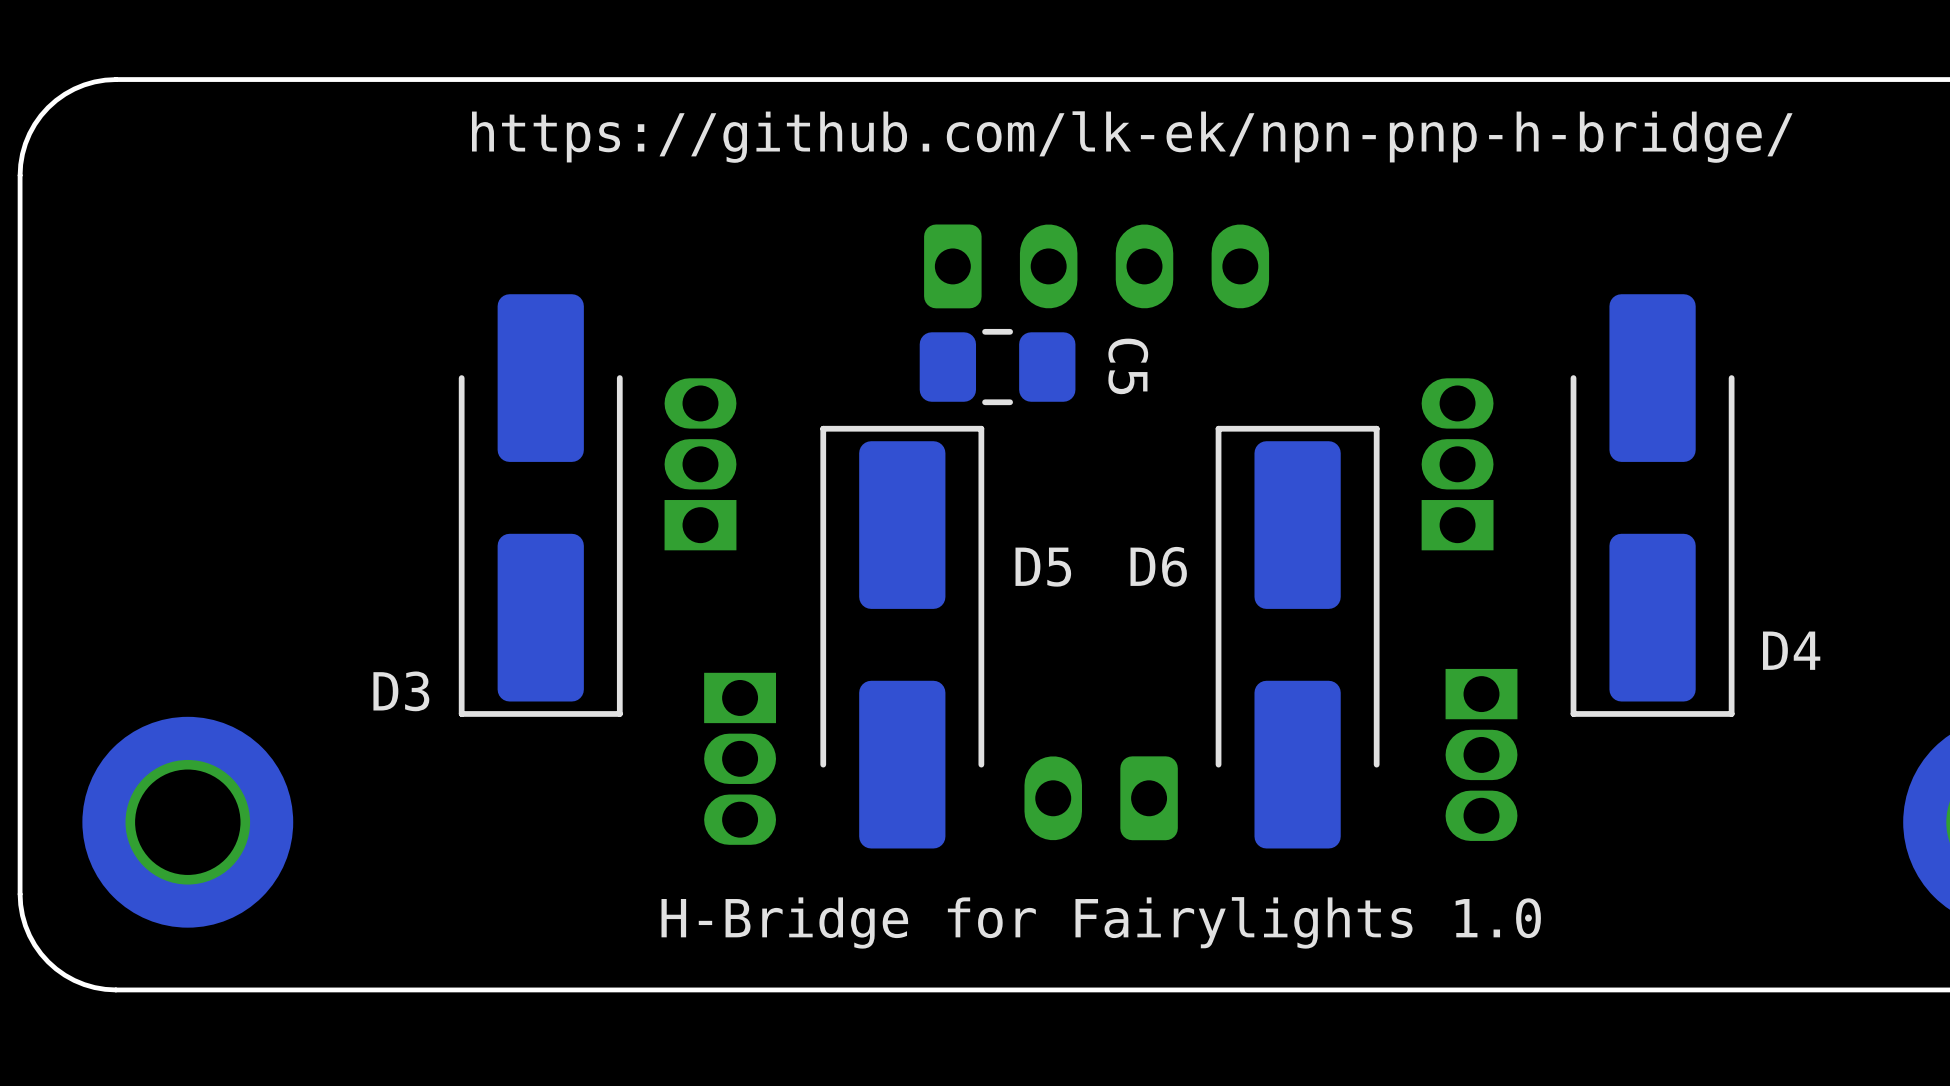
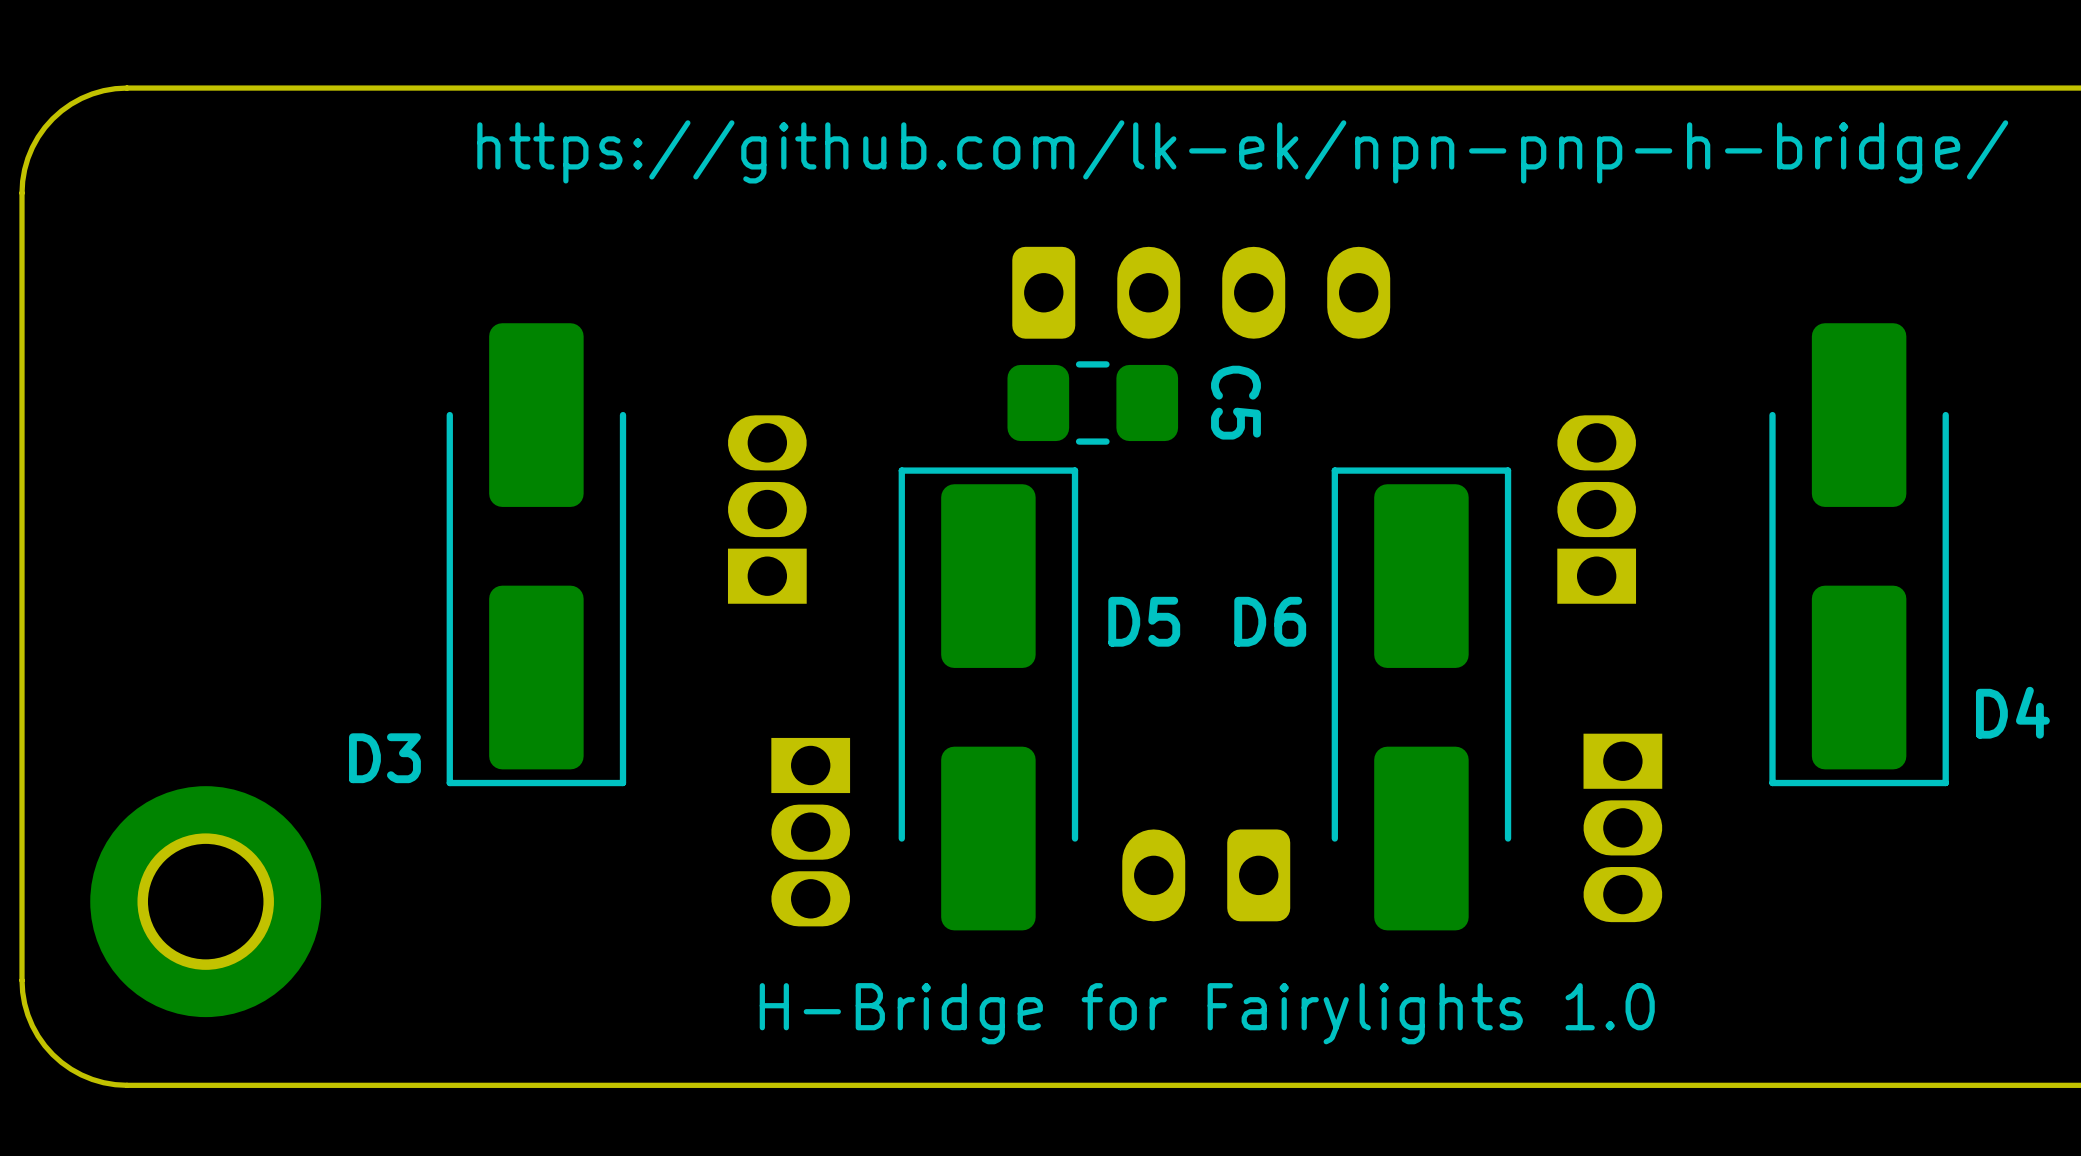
D3 position: (540, 505) -> (536, 554)
D4 position: (1652, 505) -> (1859, 554)

